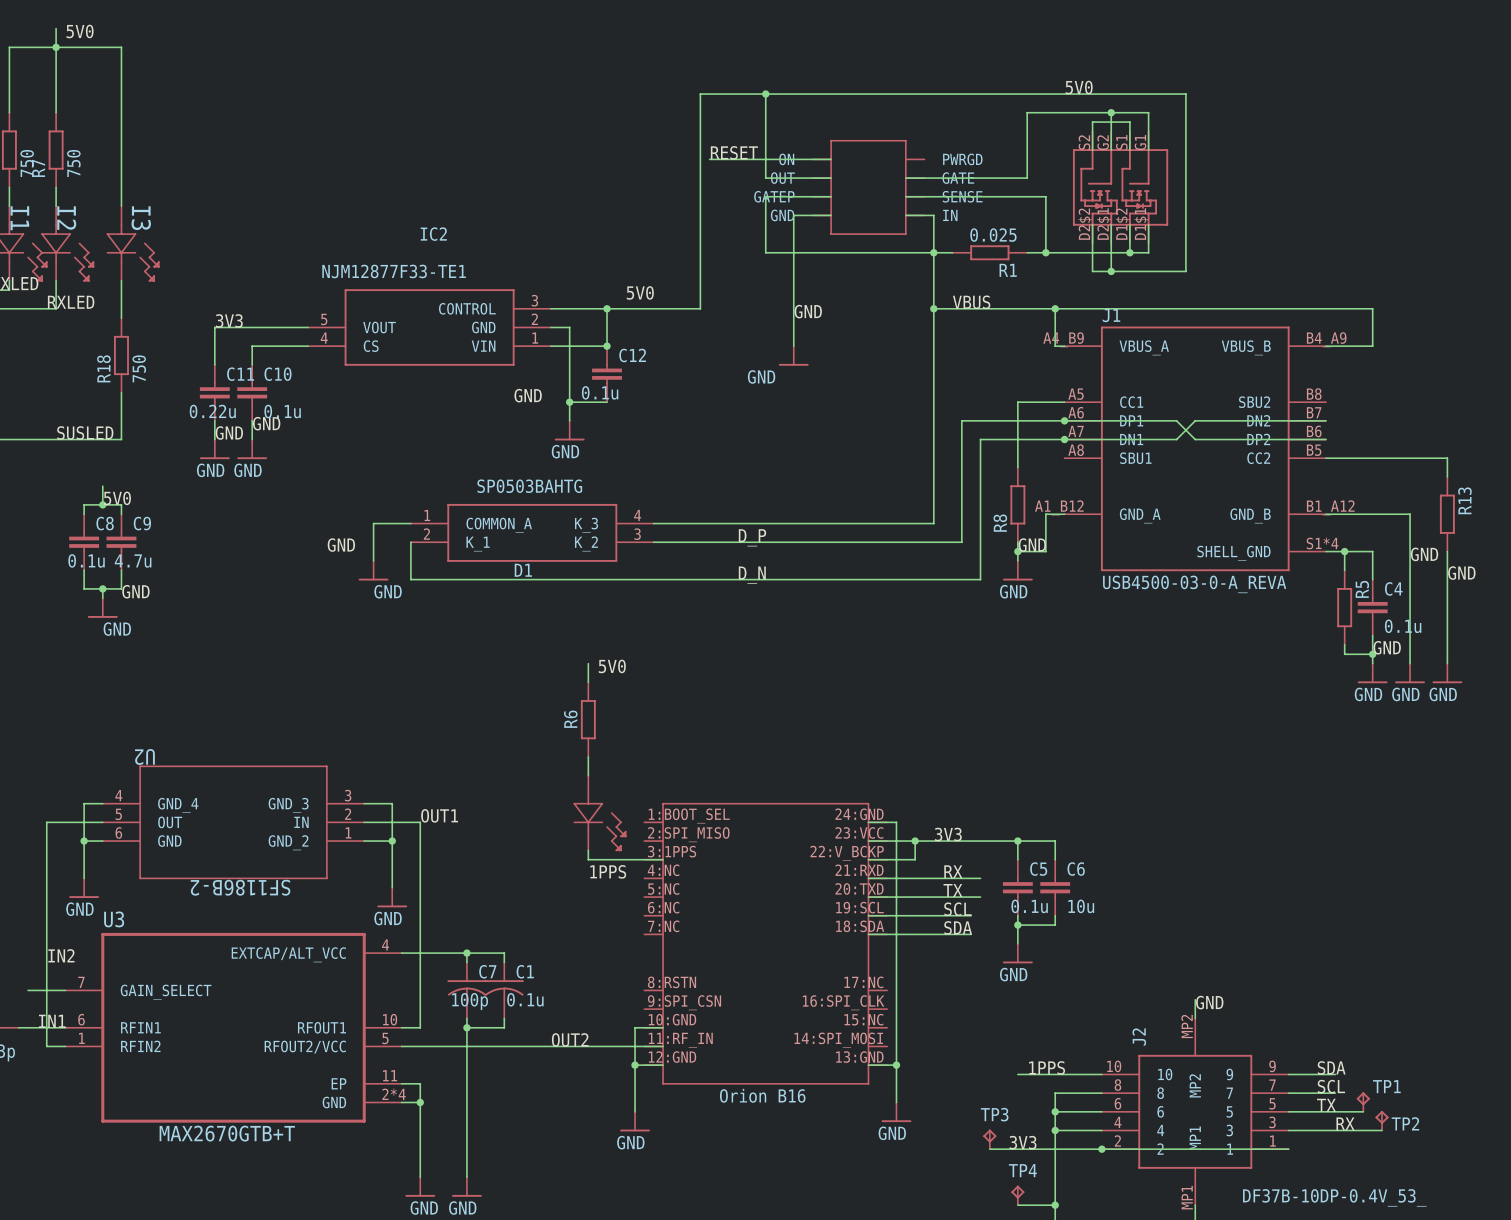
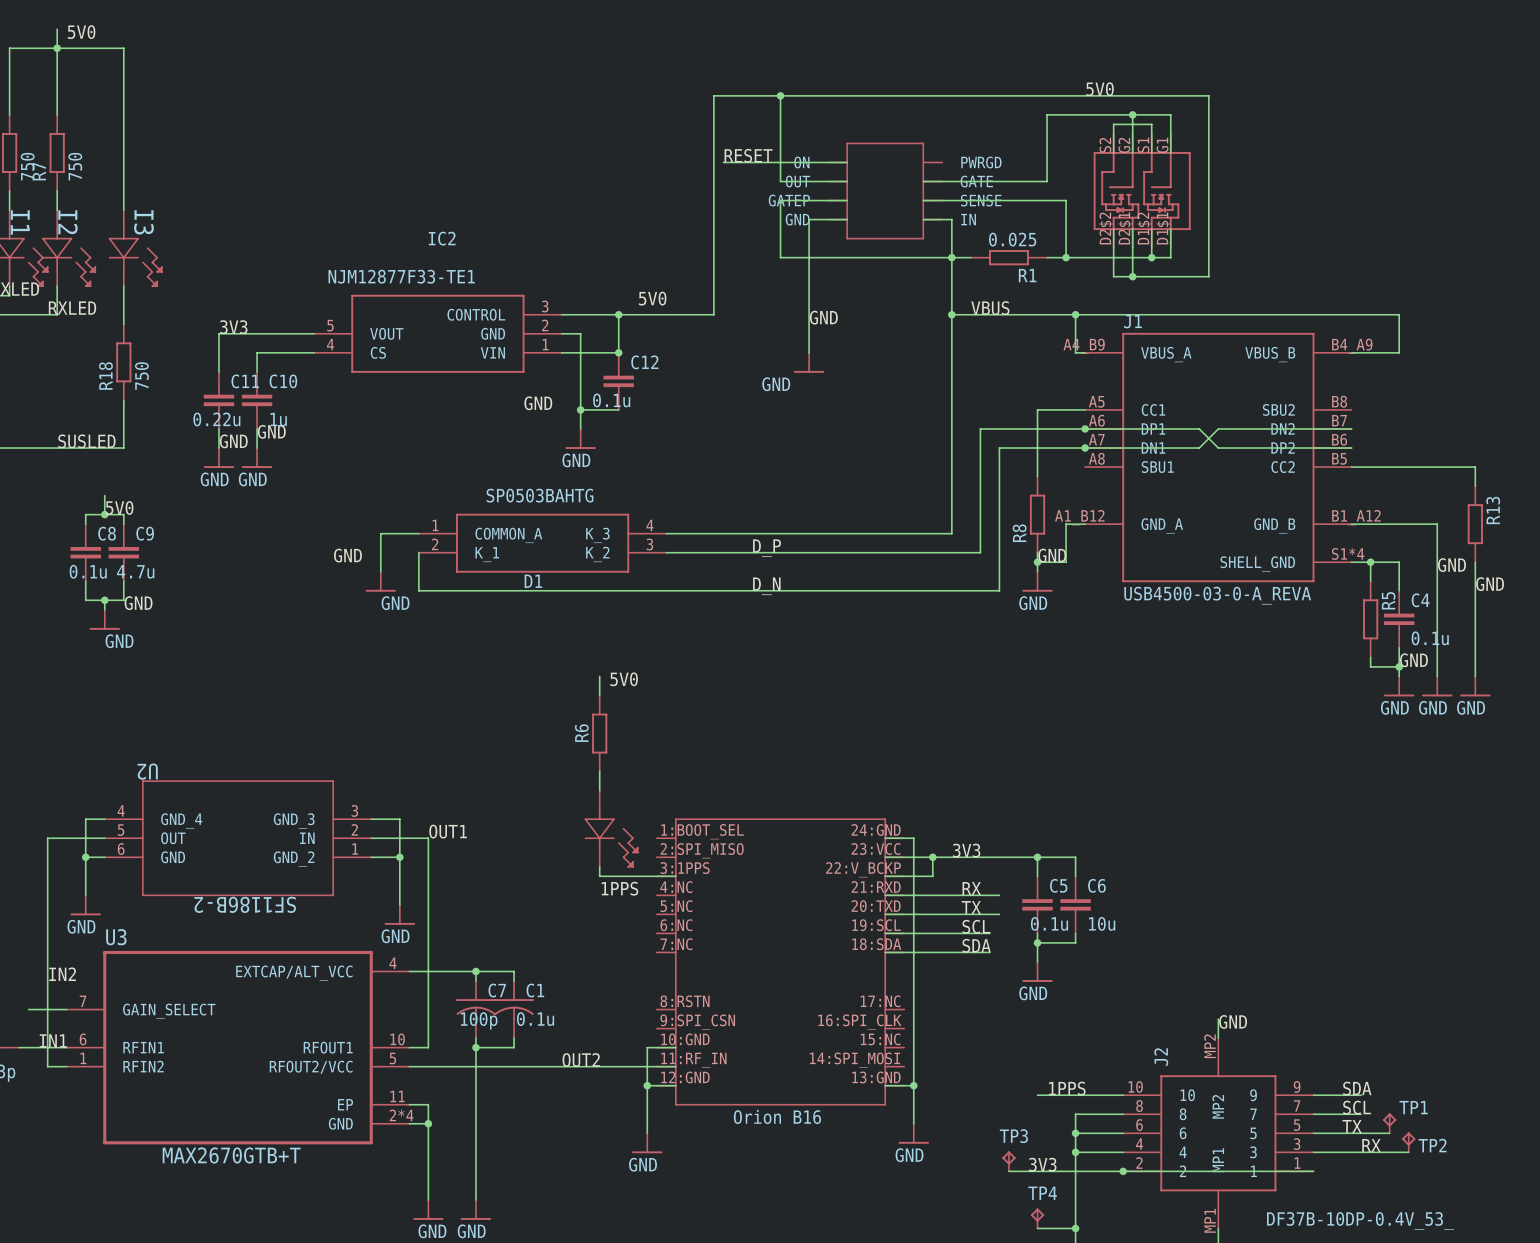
C10 value: 0.1u (282, 411) -> 1u (278, 419)

